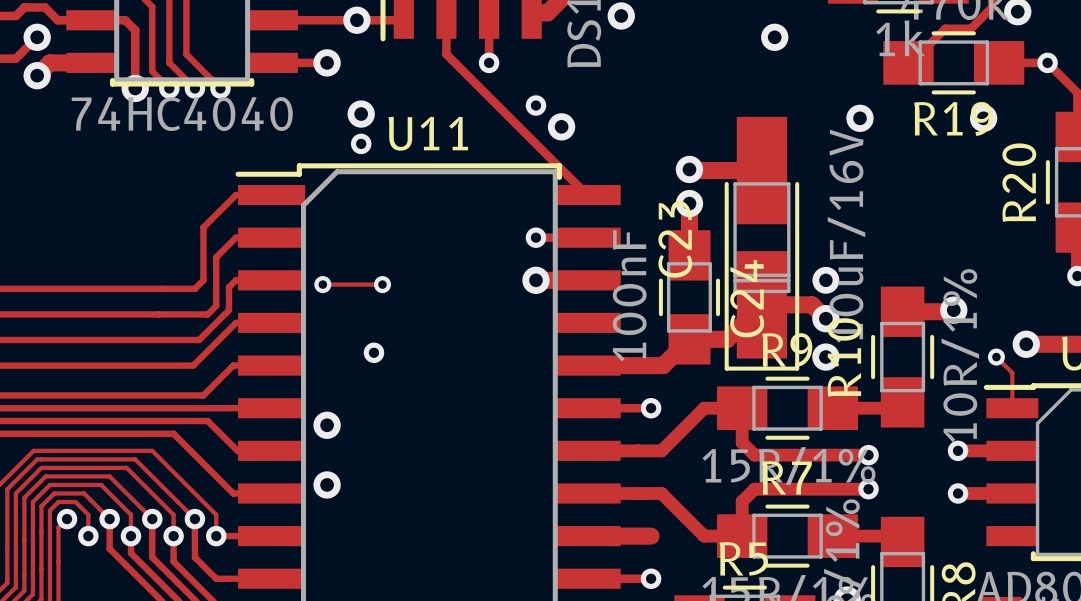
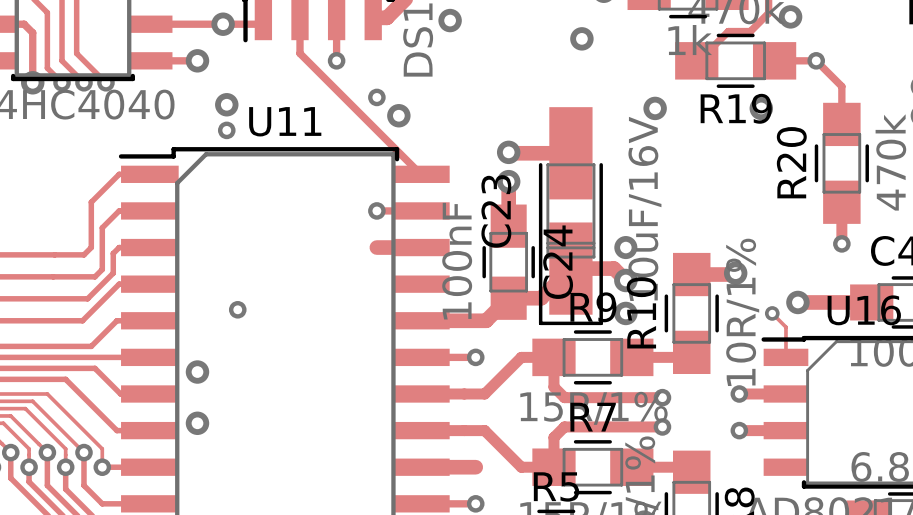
via: (535, 280) -> none
track: (322, 284) (382, 284) -> none
via: (322, 284) -> none
via: (382, 284) -> none

